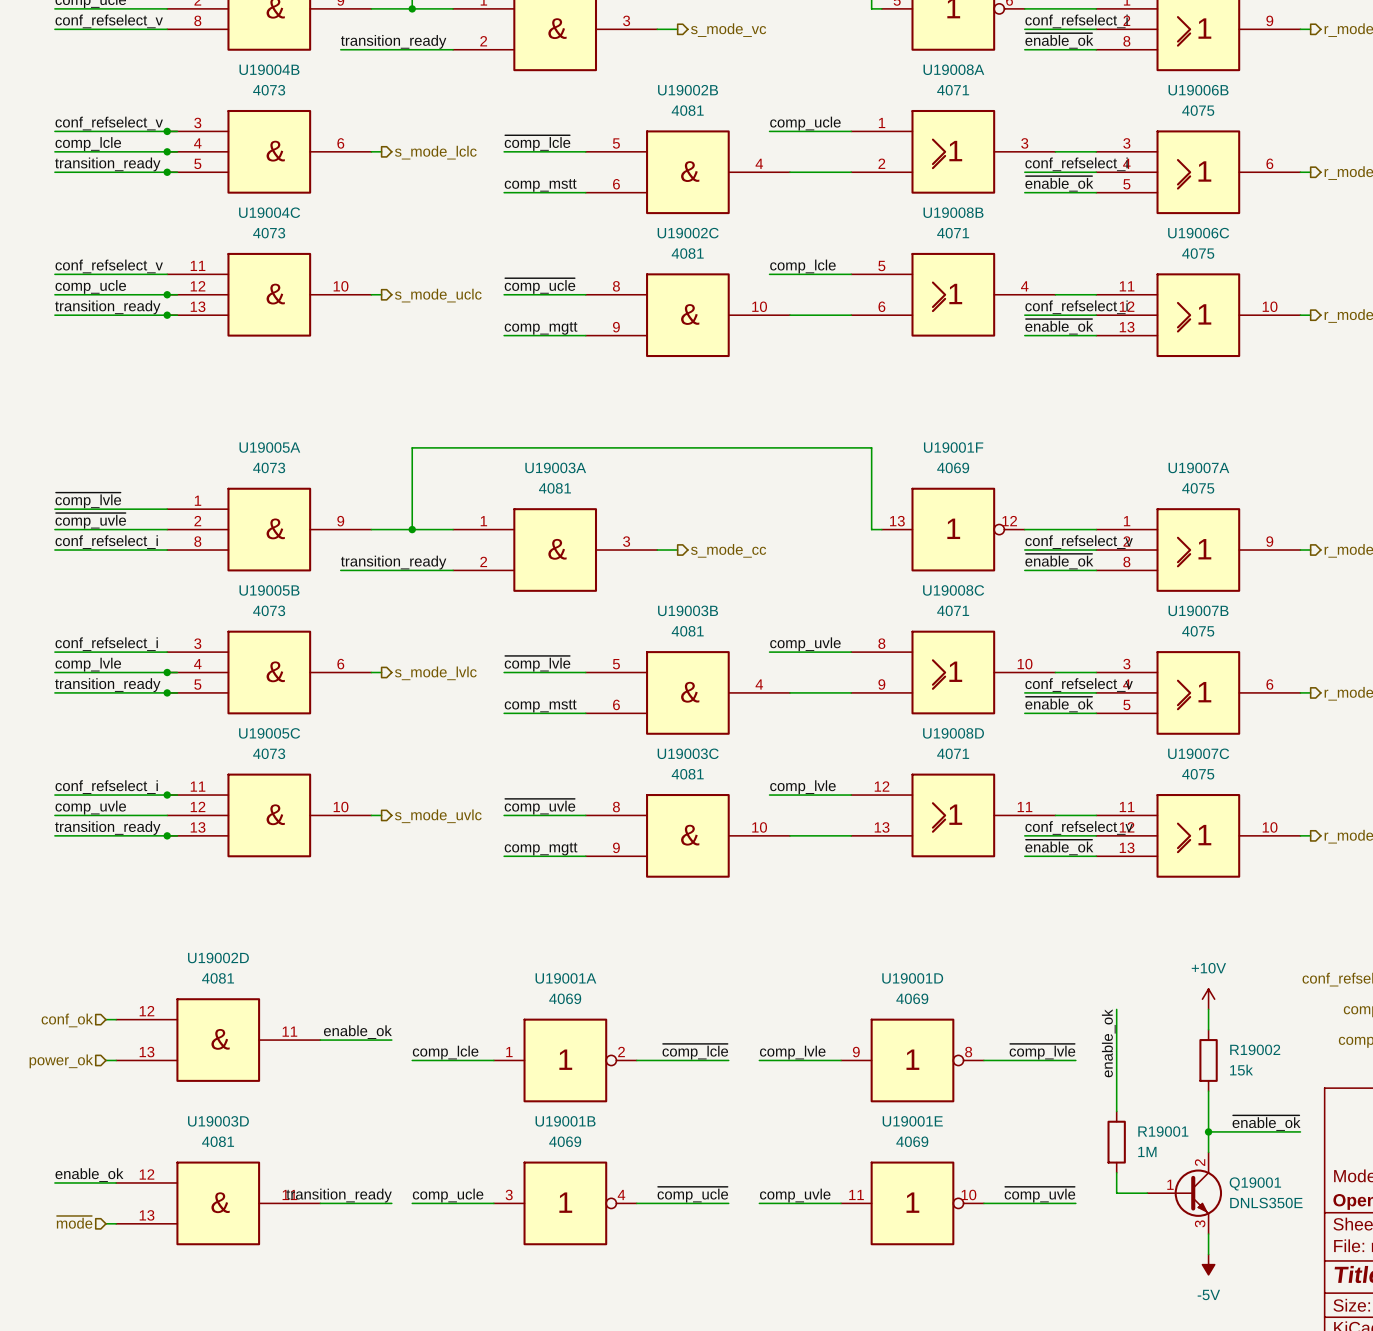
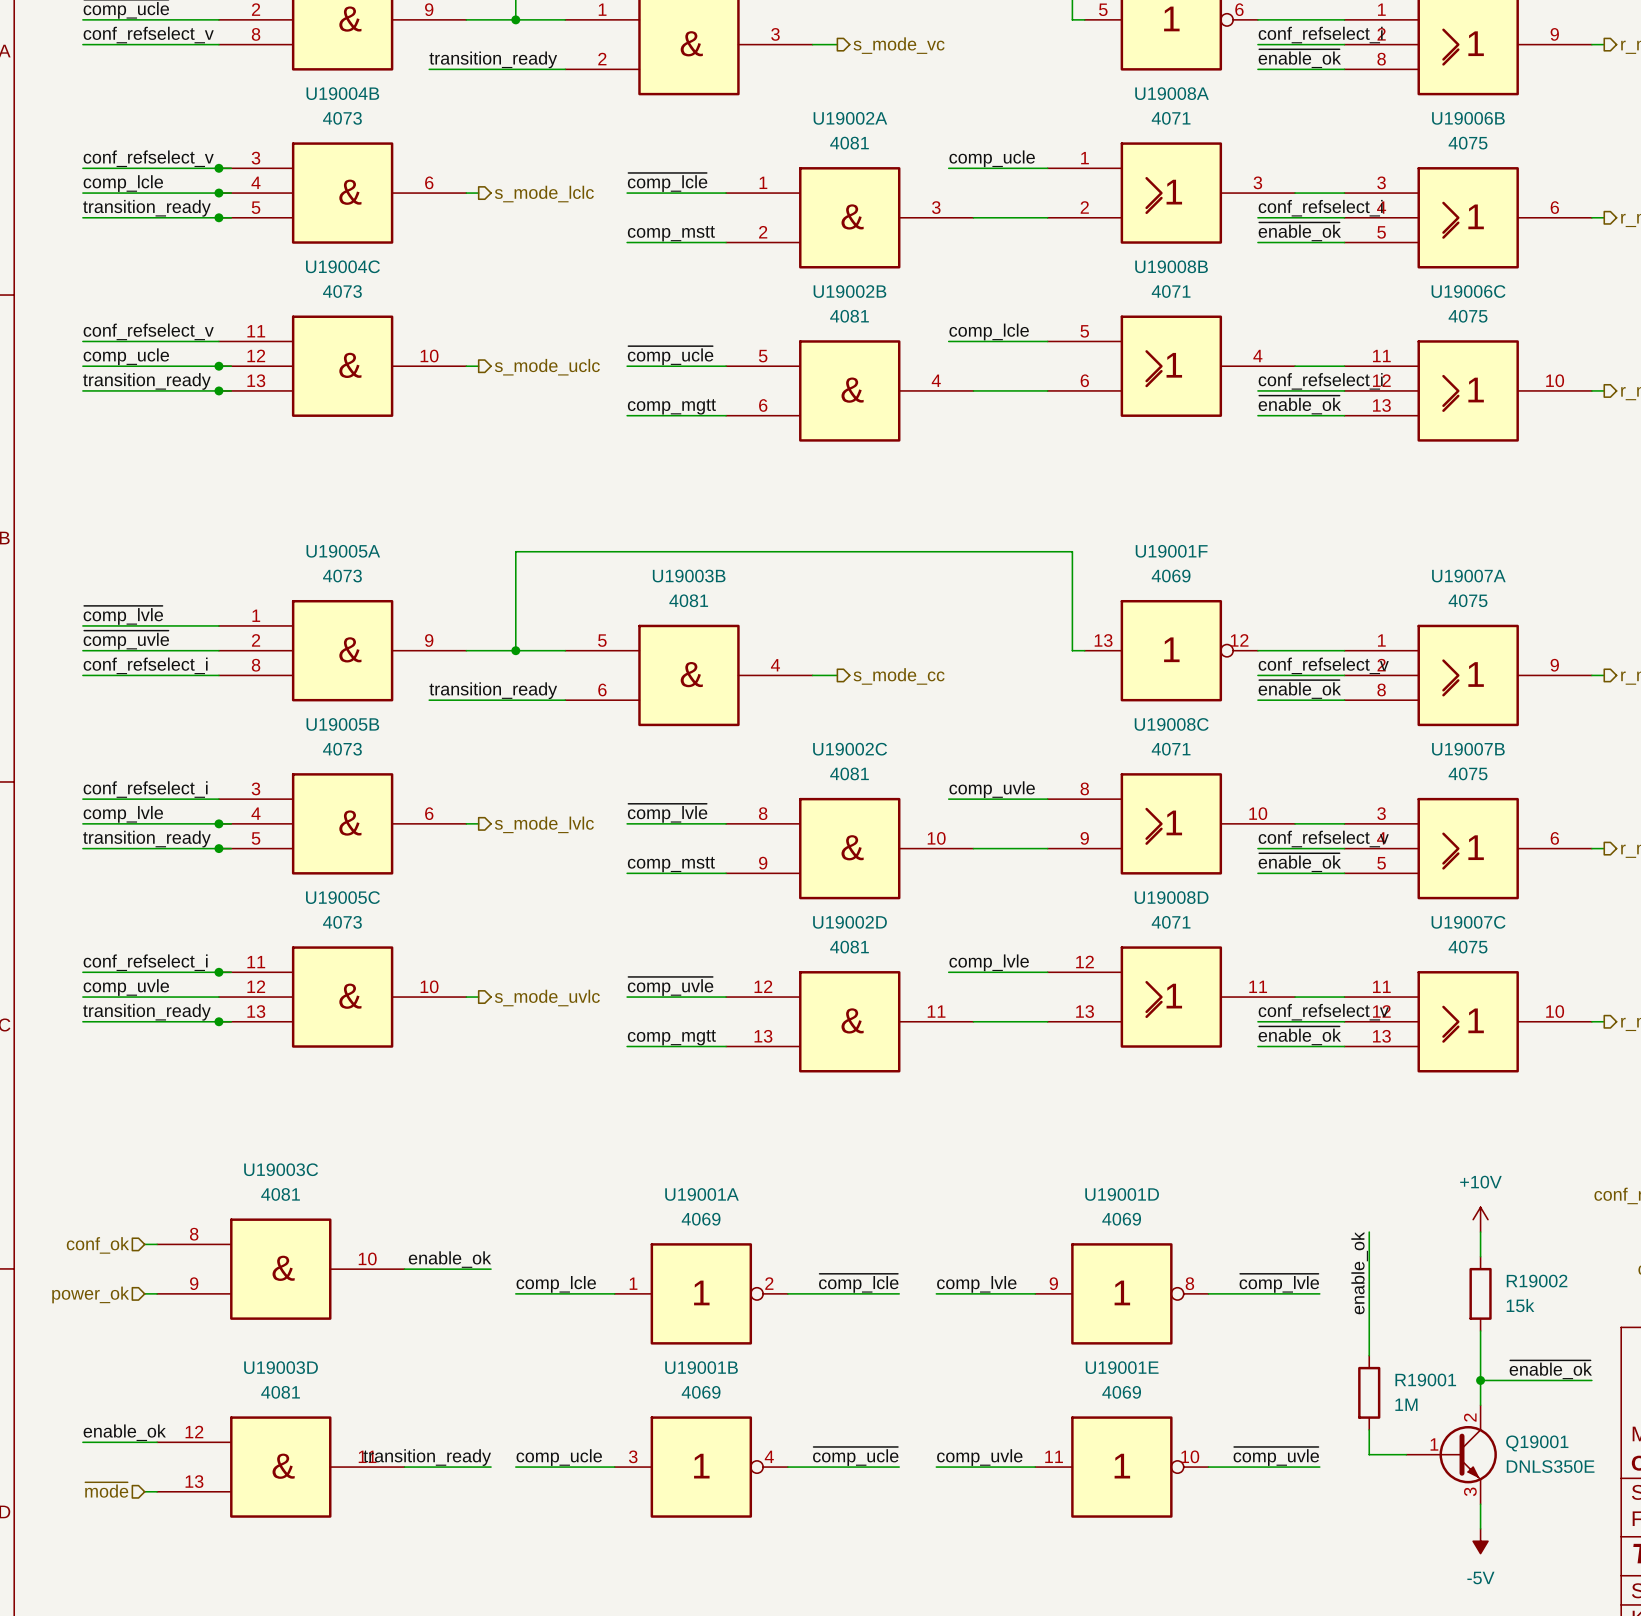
U19002B position: (687, 172) -> (849, 390)
U19002A: none -> 4081 (849, 217)
U19002C position: (687, 315) -> (849, 848)
U19003A: 4081 (555, 550) -> none
U19003B position: (687, 692) -> (688, 675)
U19003C position: (687, 835) -> (280, 1269)
U19002D position: (218, 1040) -> (849, 1021)

